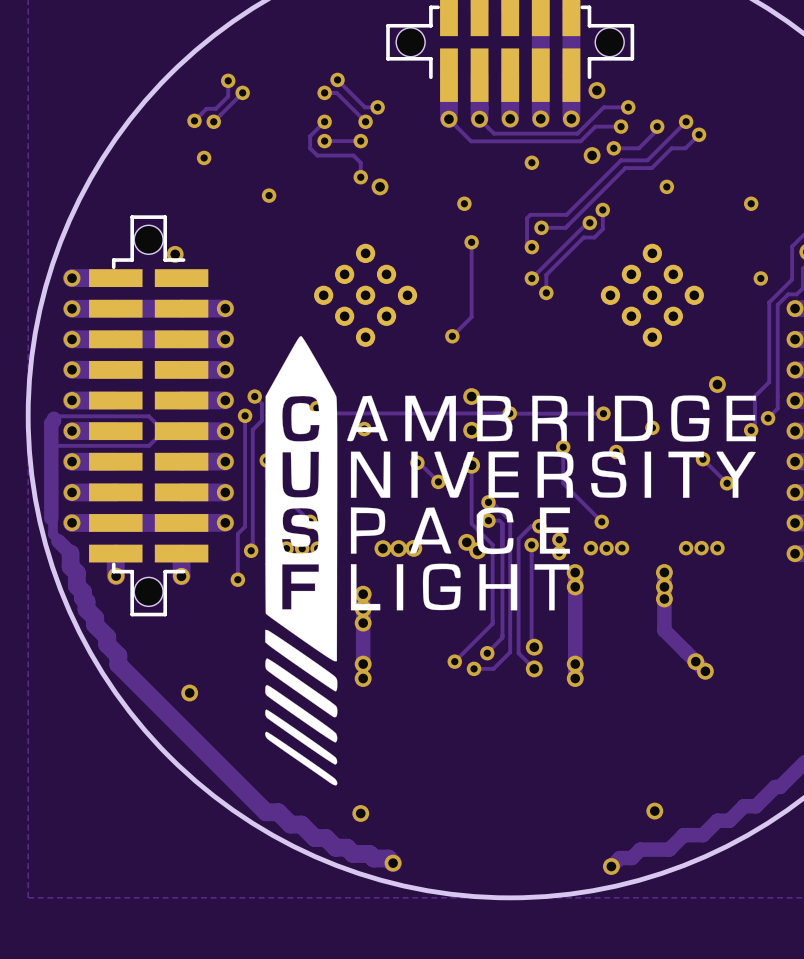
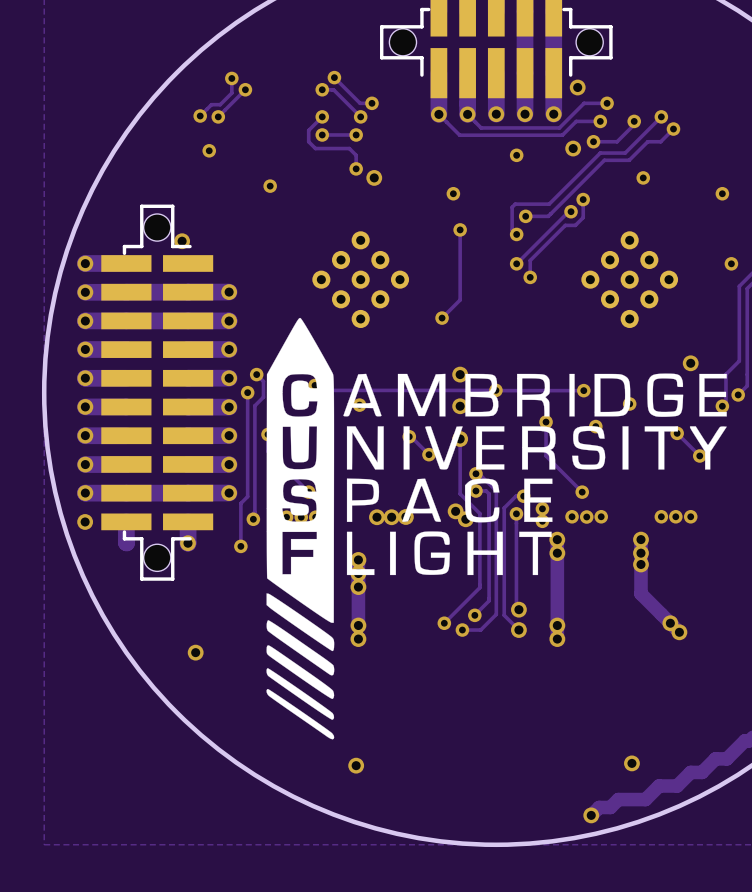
track: (53, 418) (51, 423) (53, 534) (70, 553) (70, 566) (76, 572) (76, 585) (82, 592) (82, 598) (86, 601) (86, 609) (95, 618) (95, 625) (107, 637) (107, 644) (118, 655) (118, 664) (266, 812) (278, 812) (290, 824) (301, 824) (314, 838) (326, 838) (335, 847) (347, 847) (353, 853) (369, 853) (374, 858) (388, 858) (393, 863) -> none
track: (52, 420) (56, 416) (148, 416) (163, 431) -> none
track: (163, 431) (149, 445) (52, 445) -> none
via position: (116, 576) -> (85, 521)
via: (393, 863) -> none

